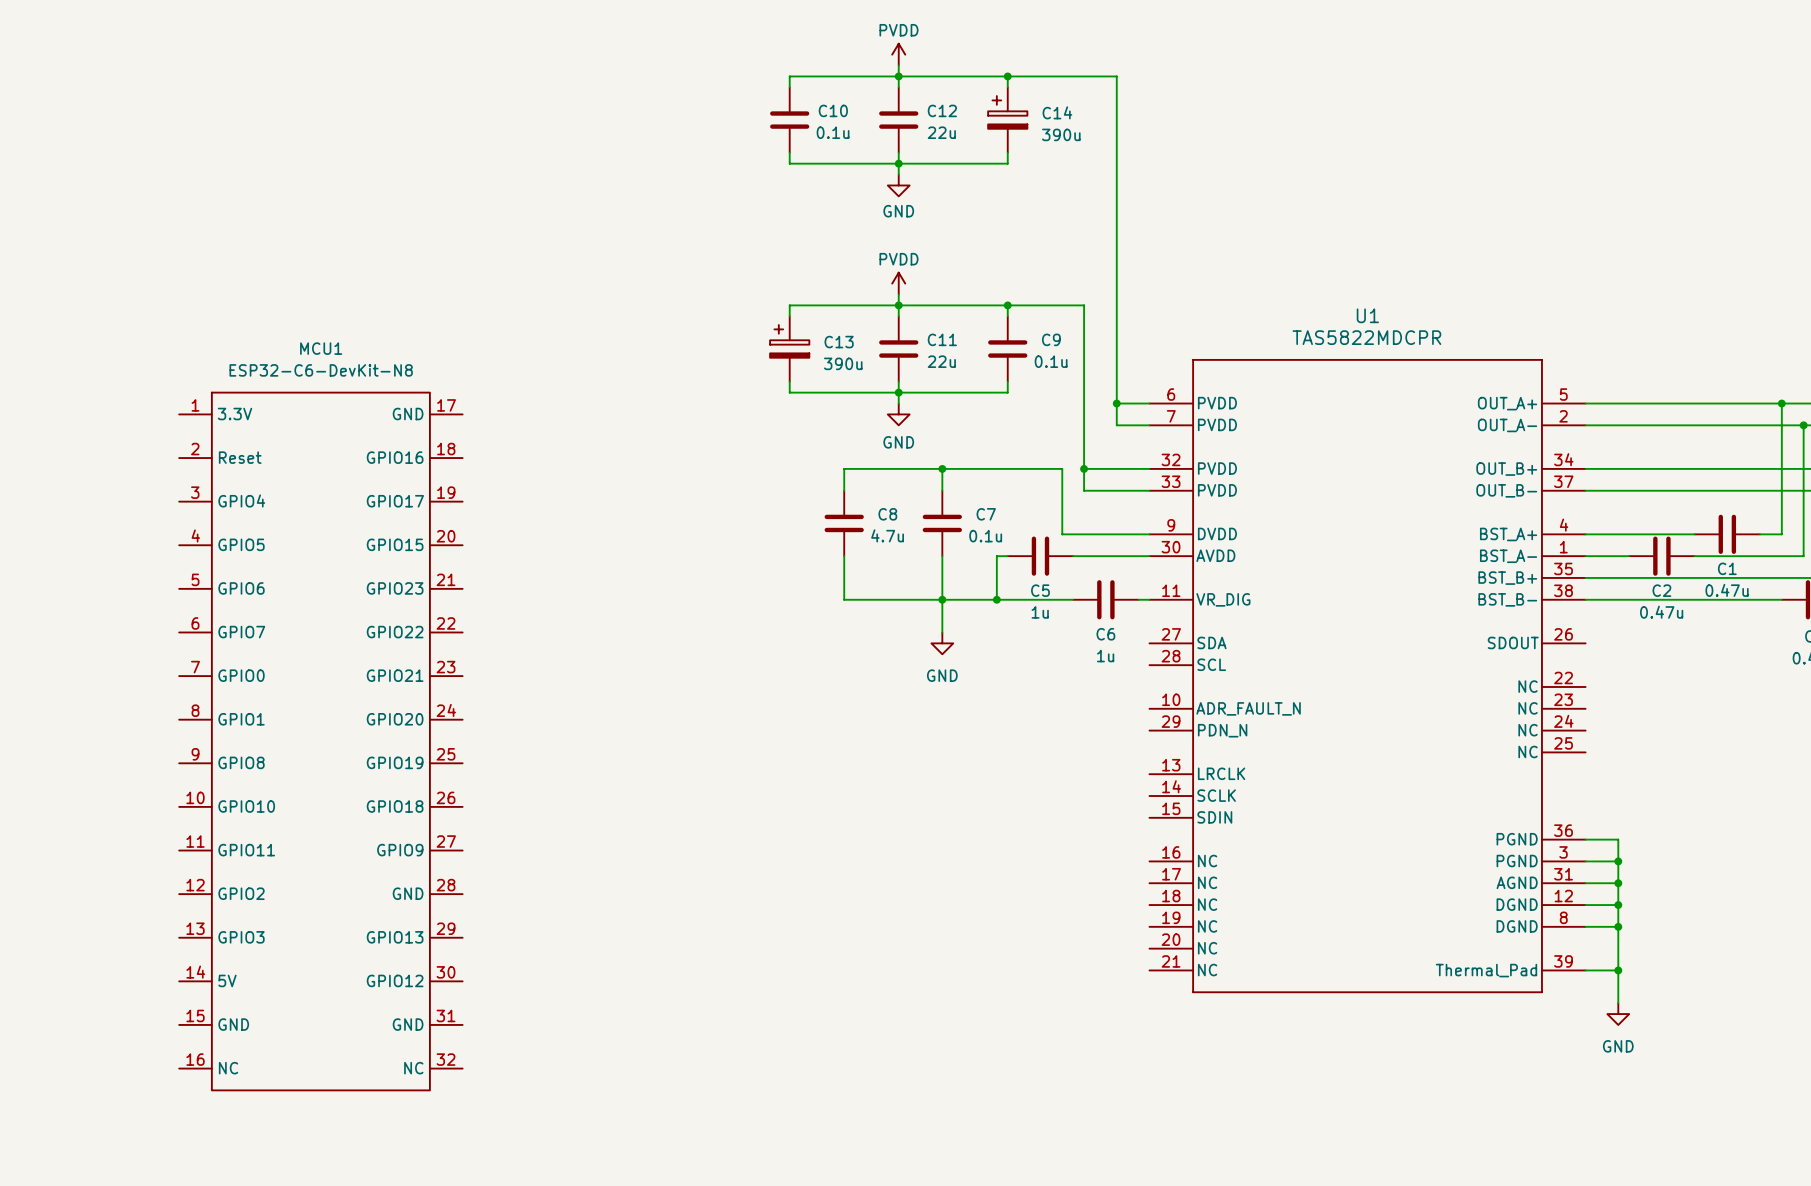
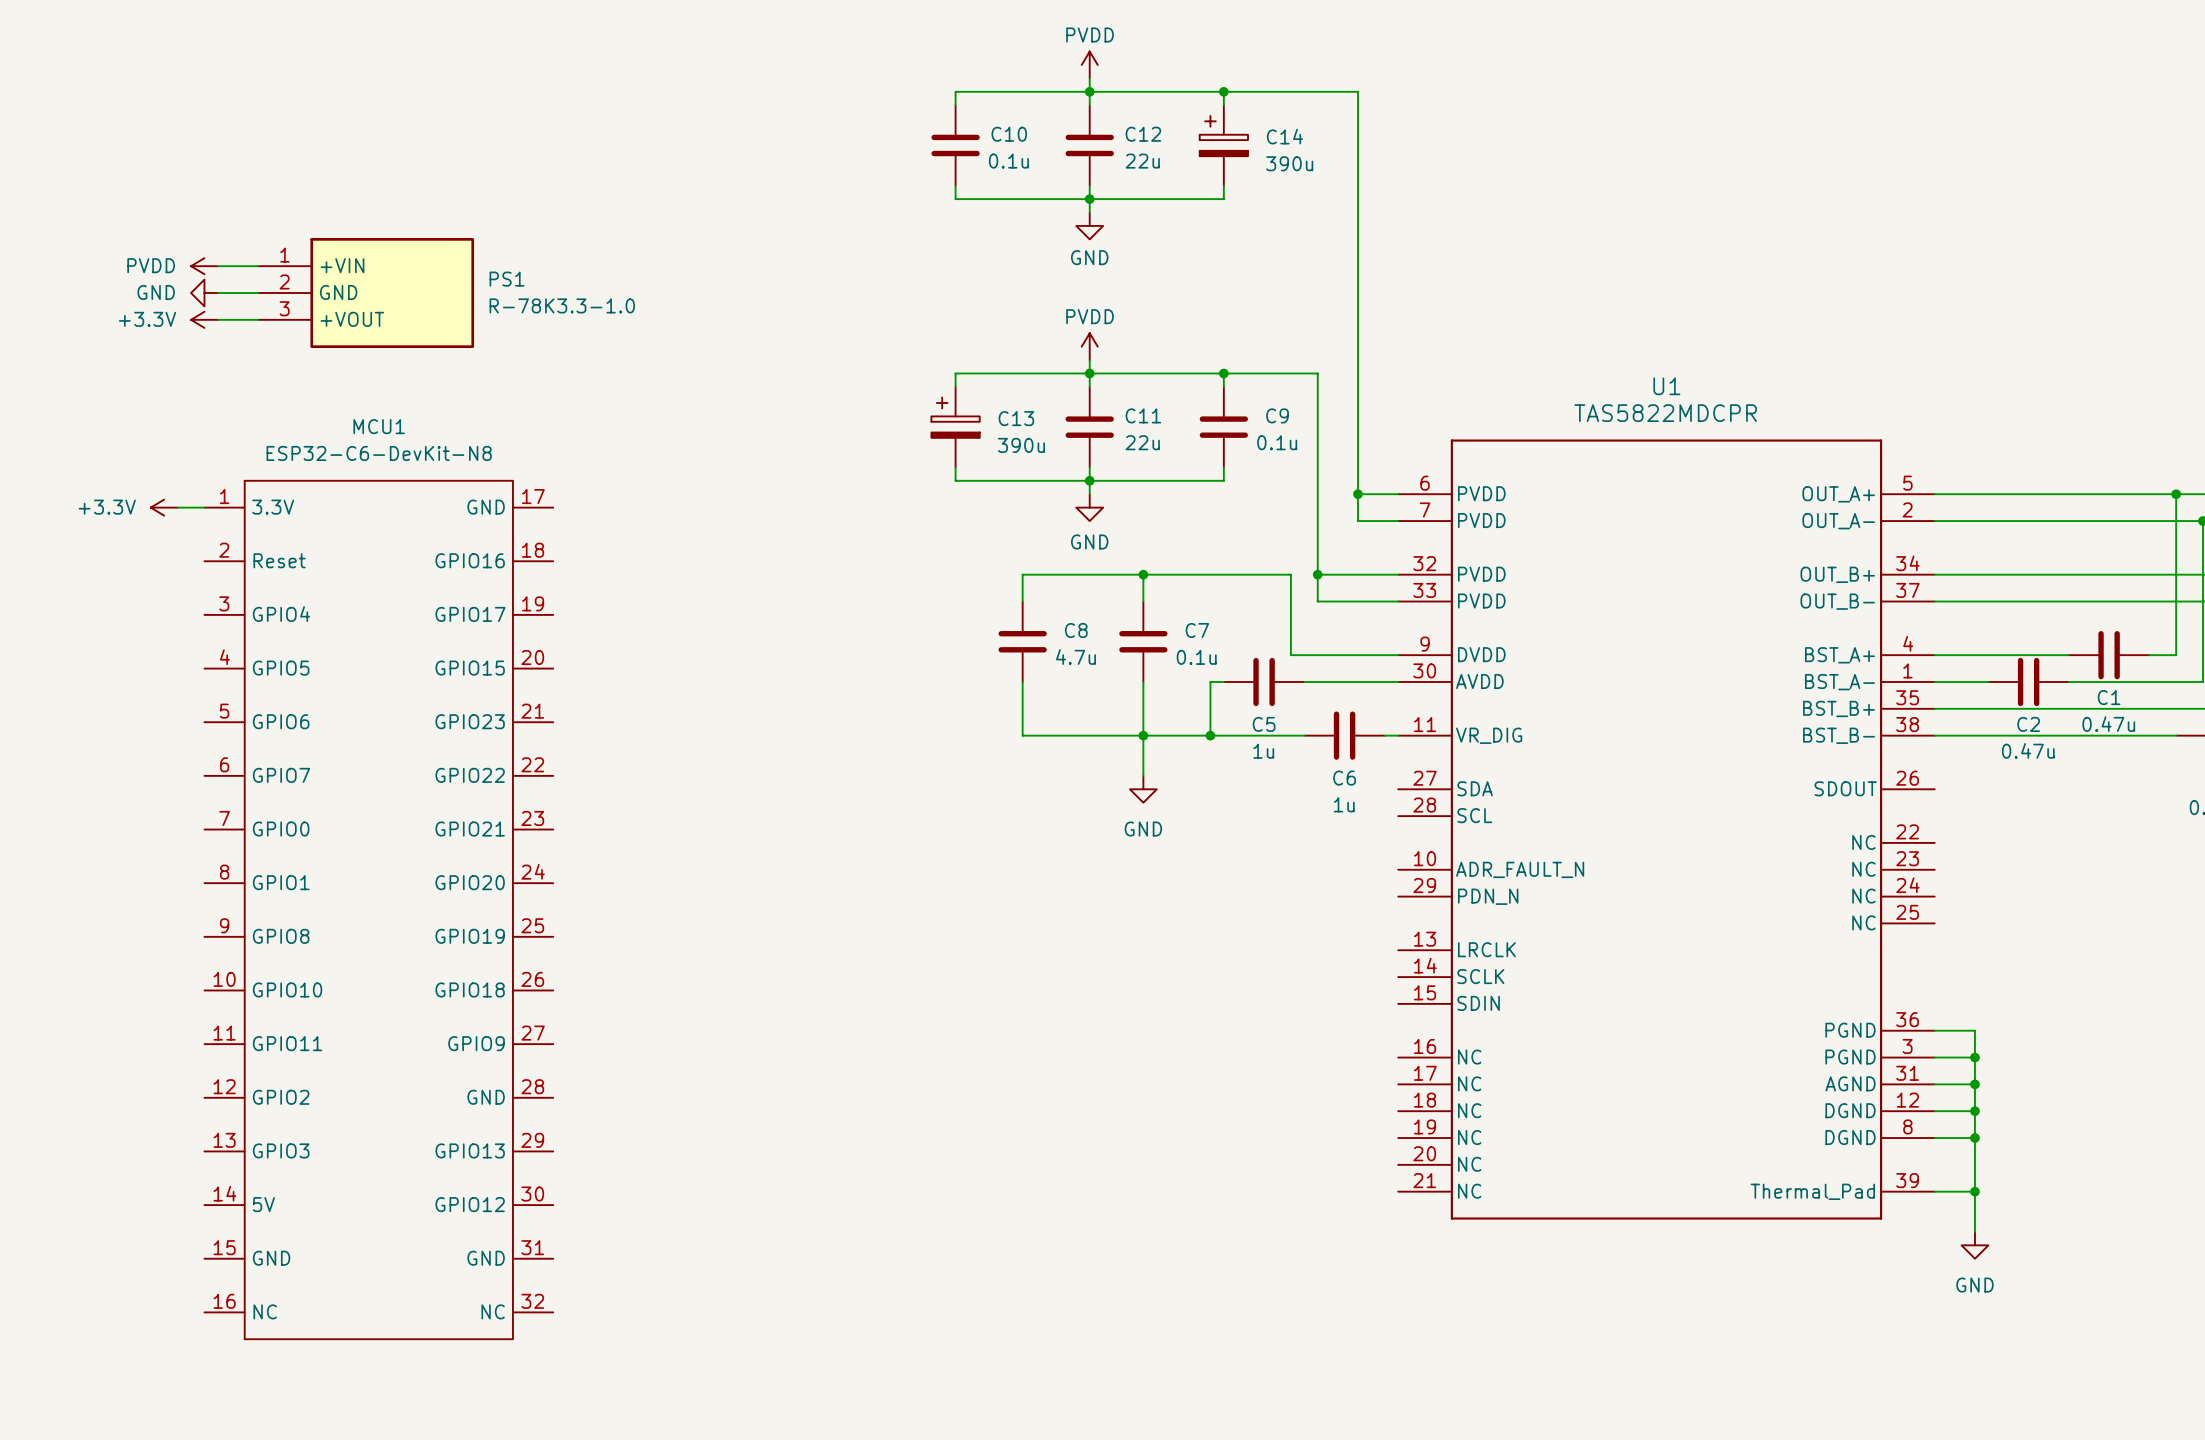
power symbol: none -> PVDD (204, 266)
wire: none -> (217, 266) (258, 266)
power symbol: none -> GND (204, 293)
wire: none -> (217, 293) (258, 293)
PS1: none -> R-78K3.3-1.0 (366, 293)
power symbol: none -> +3.3V (204, 319)
wire: none -> (217, 319) (258, 319)
power symbol: none -> +3.3V (164, 507)
wire: none -> (177, 507) (204, 507)

